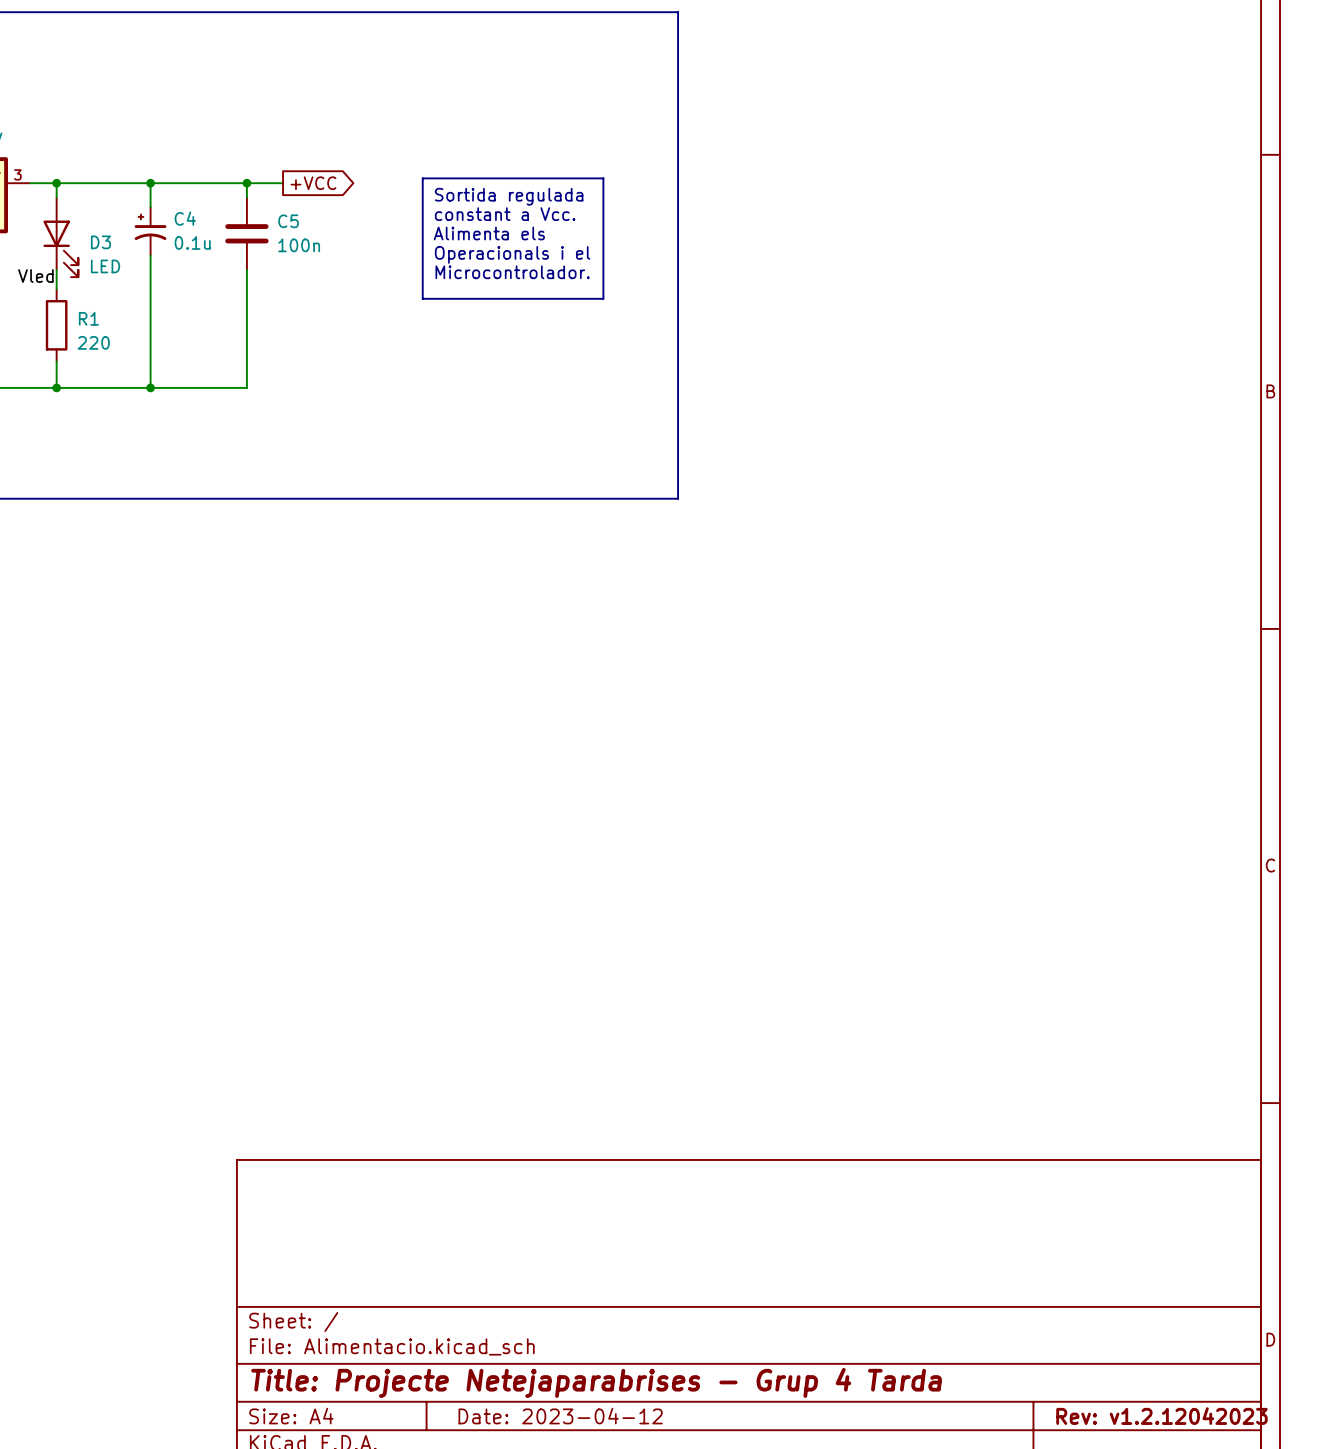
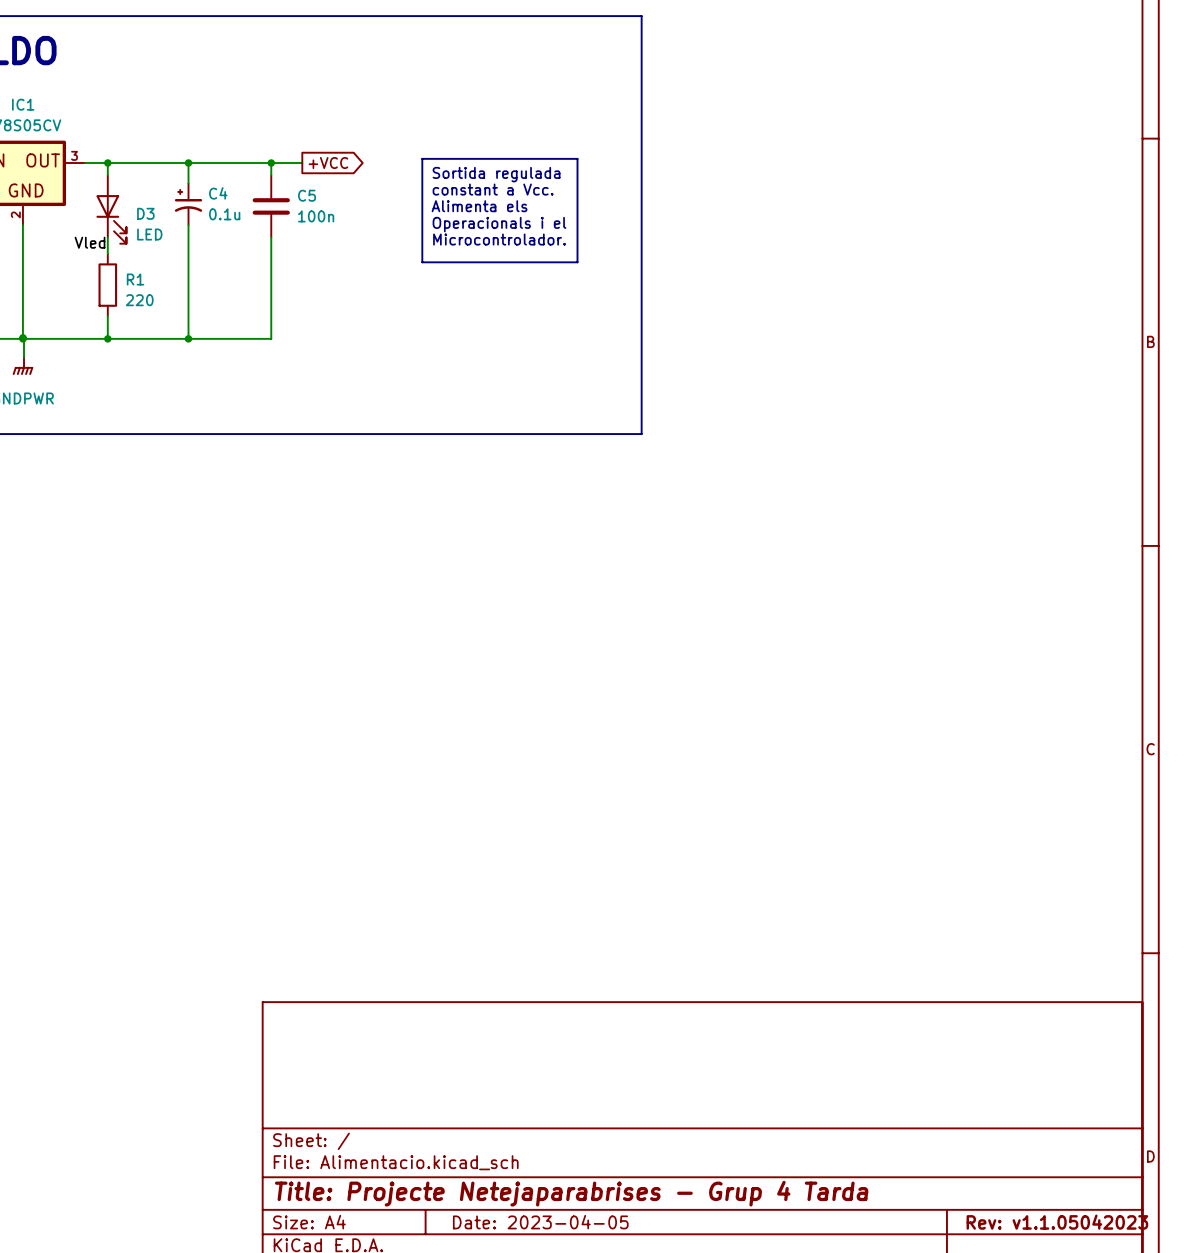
title block: Date: 2023-04-12 (560, 1416) -> Date: 2023-04-05 (540, 1222)
title block: Rev: v1.2.12042023 (1161, 1416) -> Rev: v1.1.05042023 (1057, 1222)

